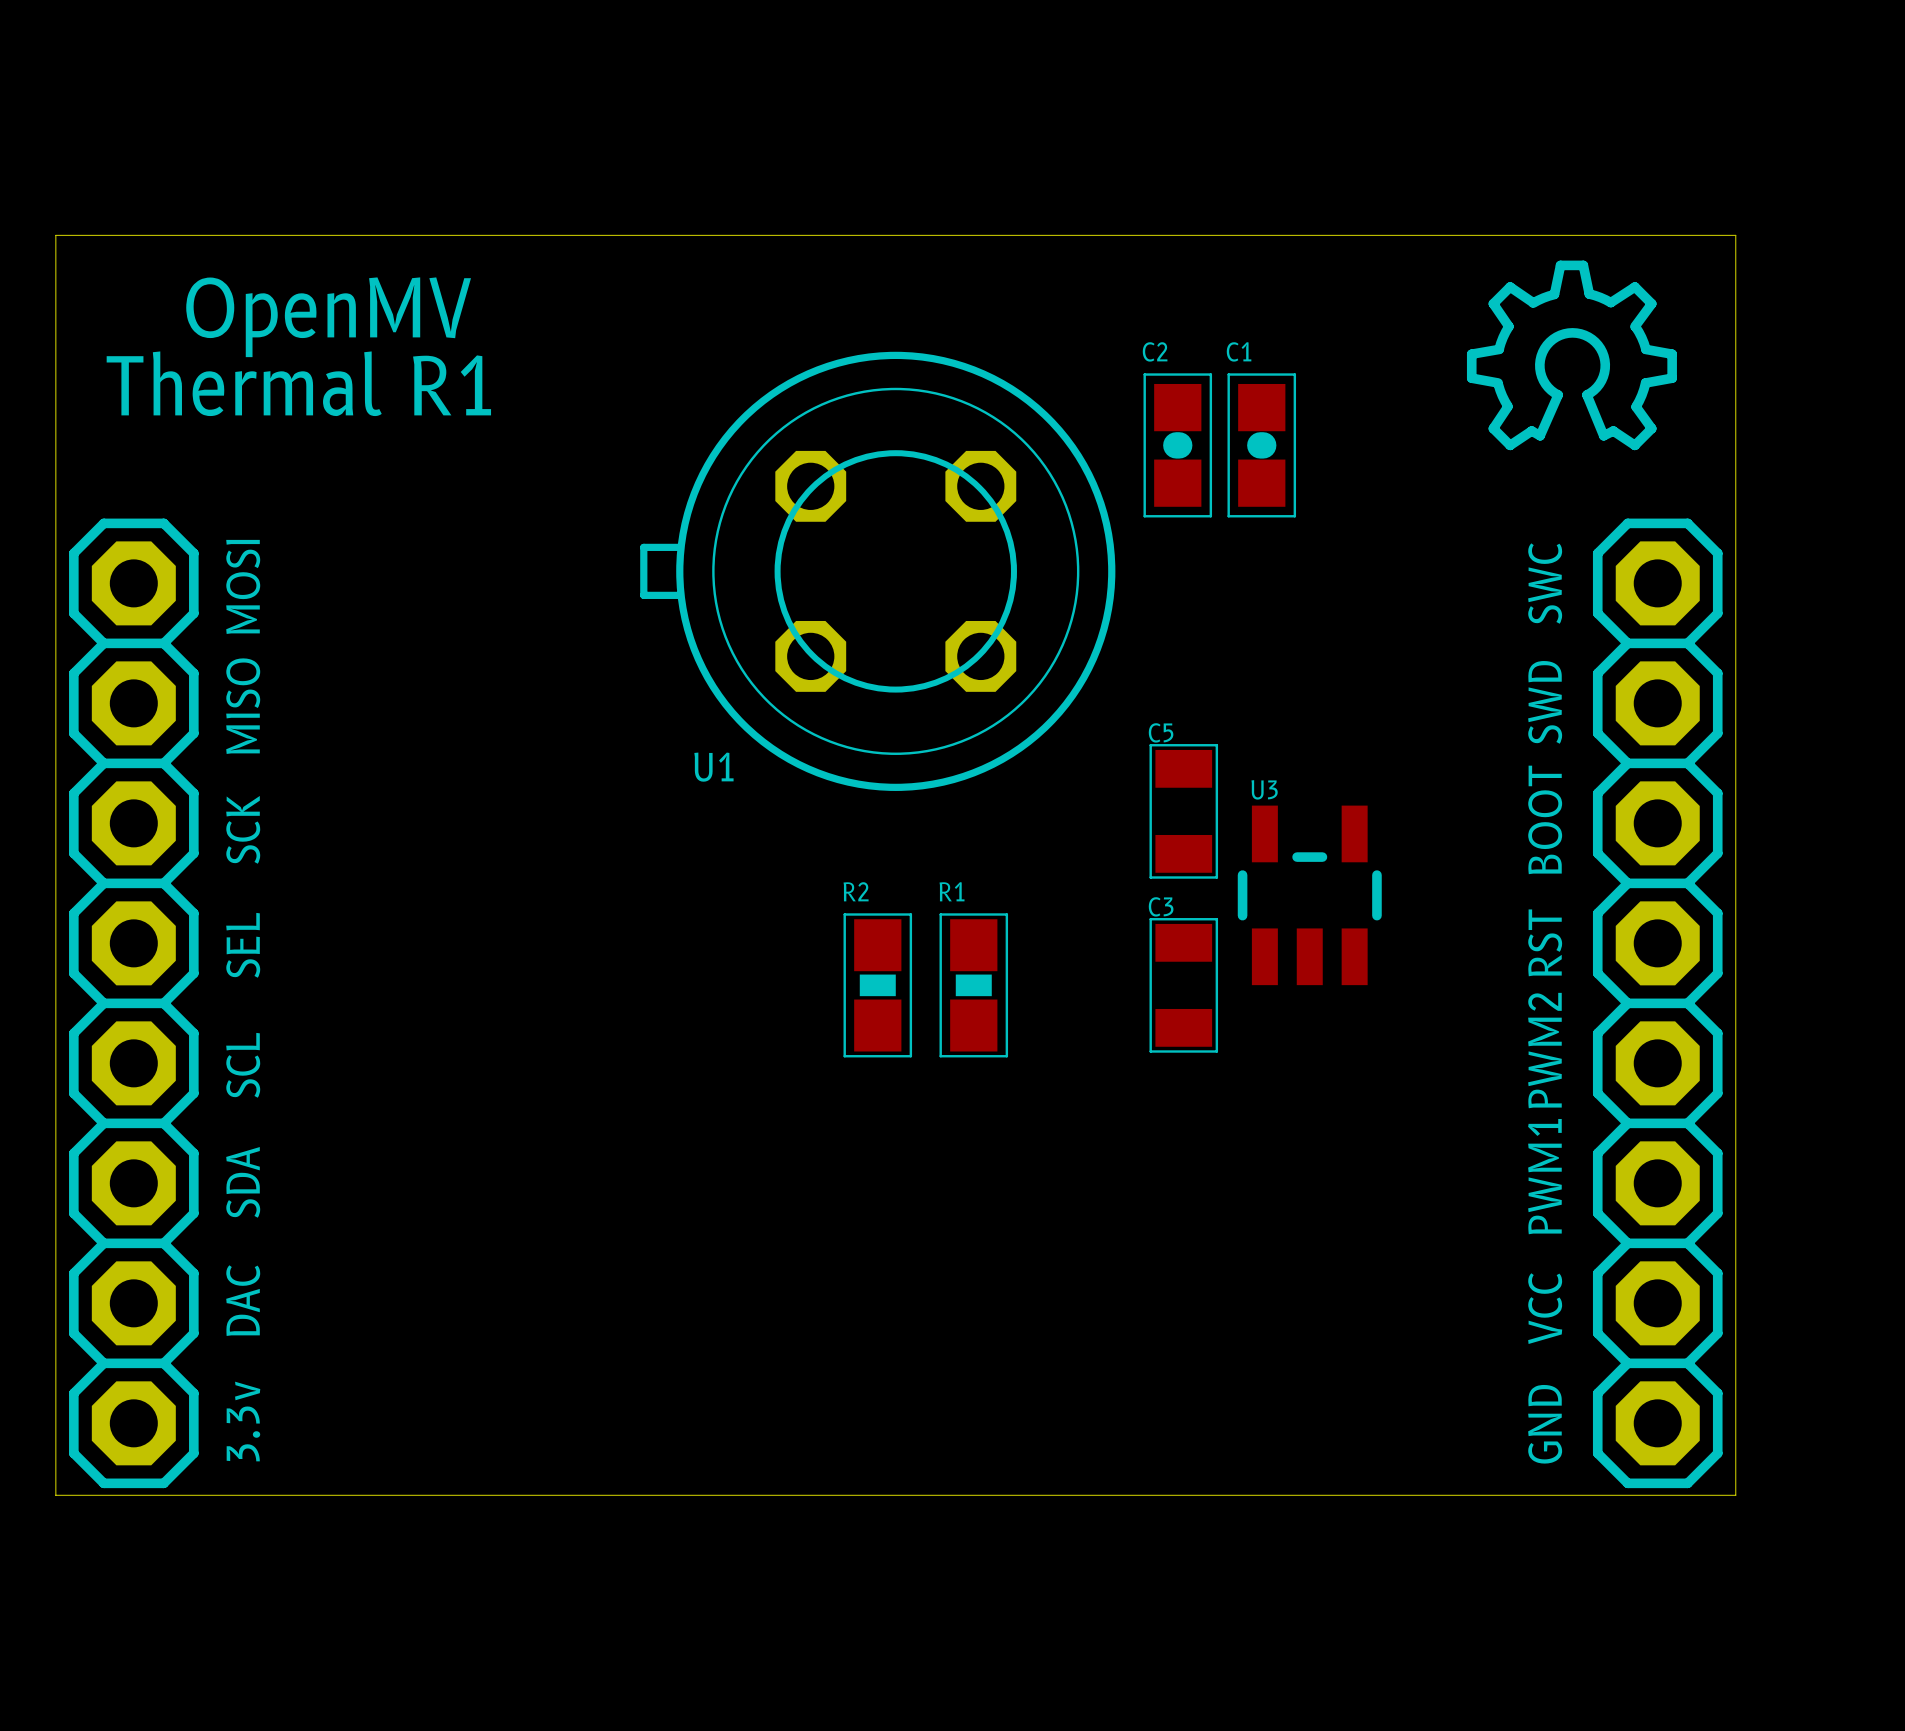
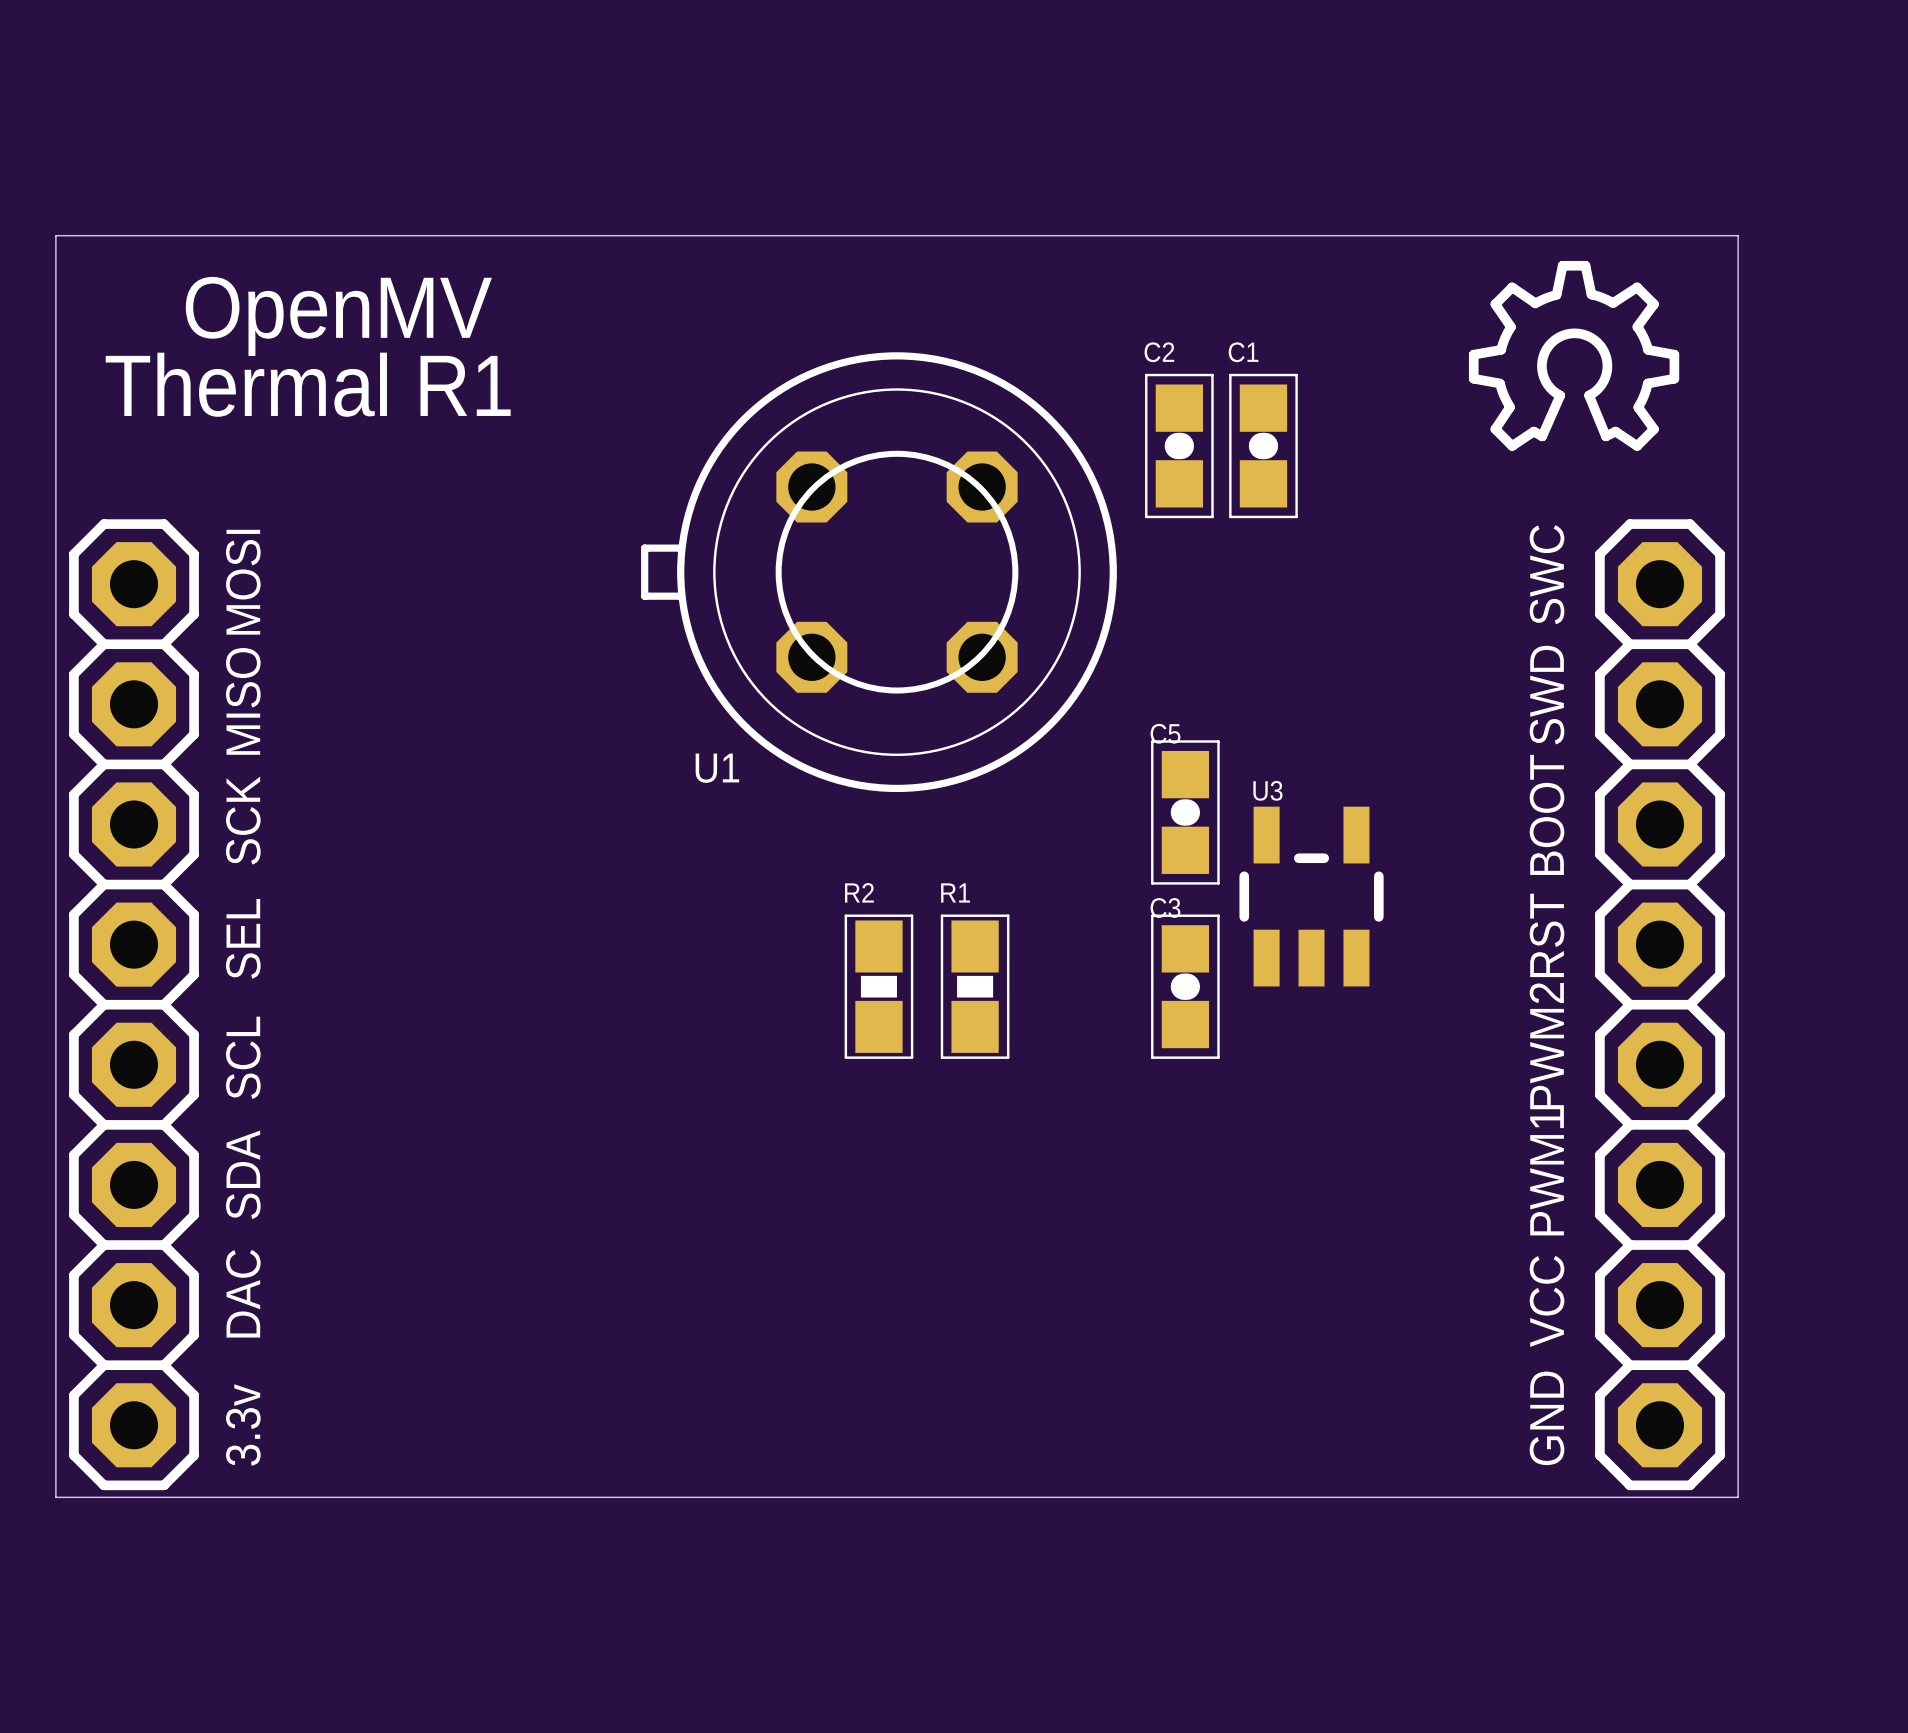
C5 footprint: [1149, 744, 1219, 879] -> [1151, 740, 1220, 885]
C3 footprint: [1149, 918, 1219, 1053] -> [1151, 914, 1220, 1059]

